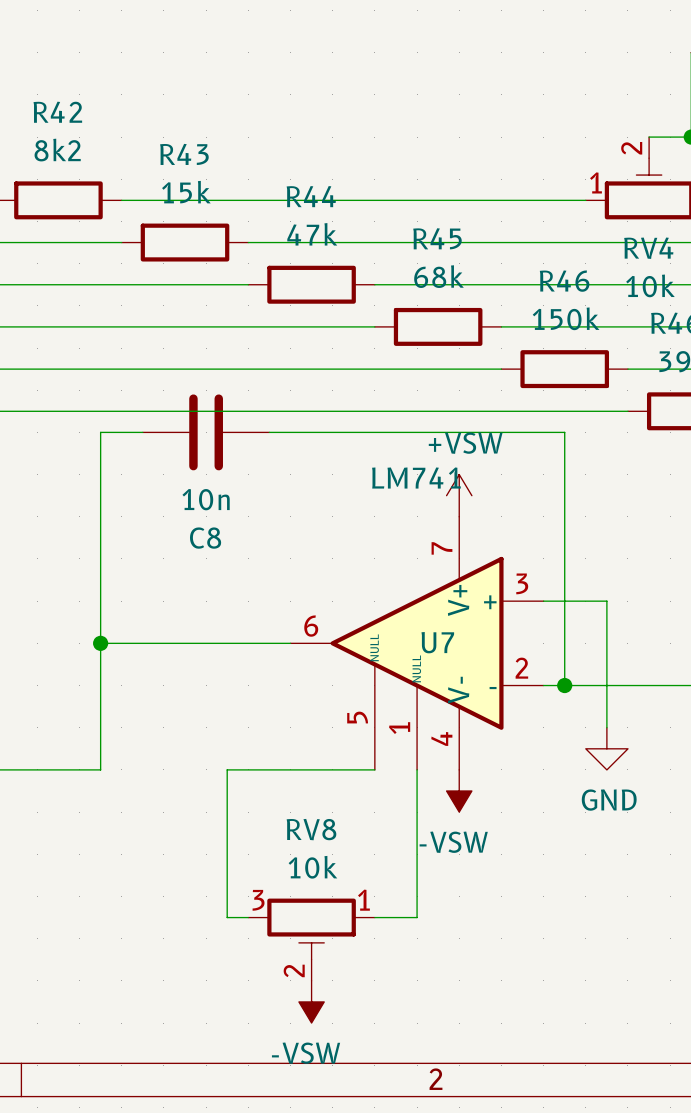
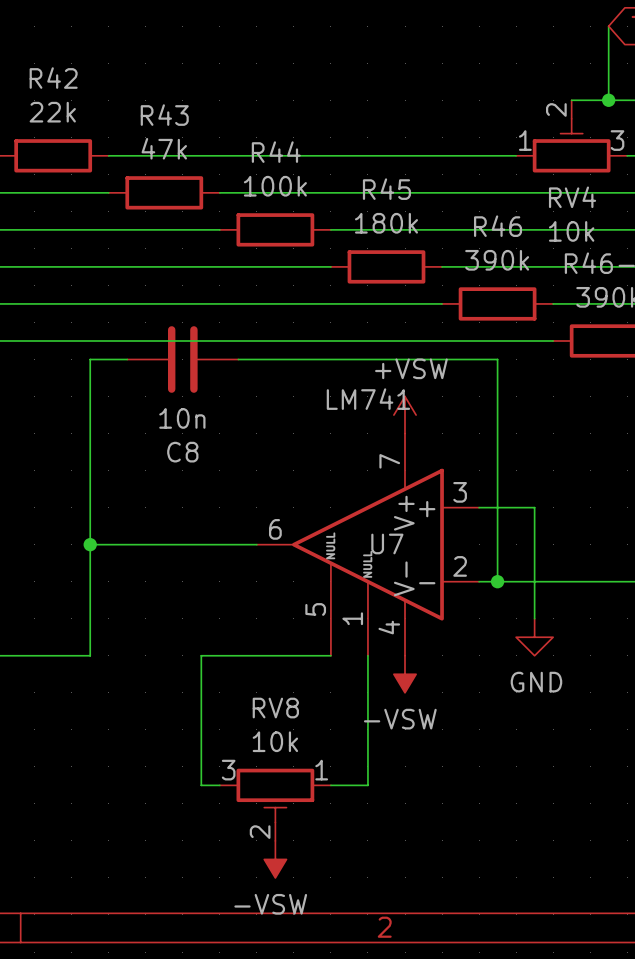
R42 value: 8k2 (57, 150) -> 22k (52, 112)
R43 value: 15k (186, 192) -> 47k (164, 148)
R44 value: 47k (312, 234) -> 100k (275, 186)
R45 value: 68k (439, 276) -> 180k (386, 223)
R46 value: 150k (566, 318) -> 390k (497, 260)

